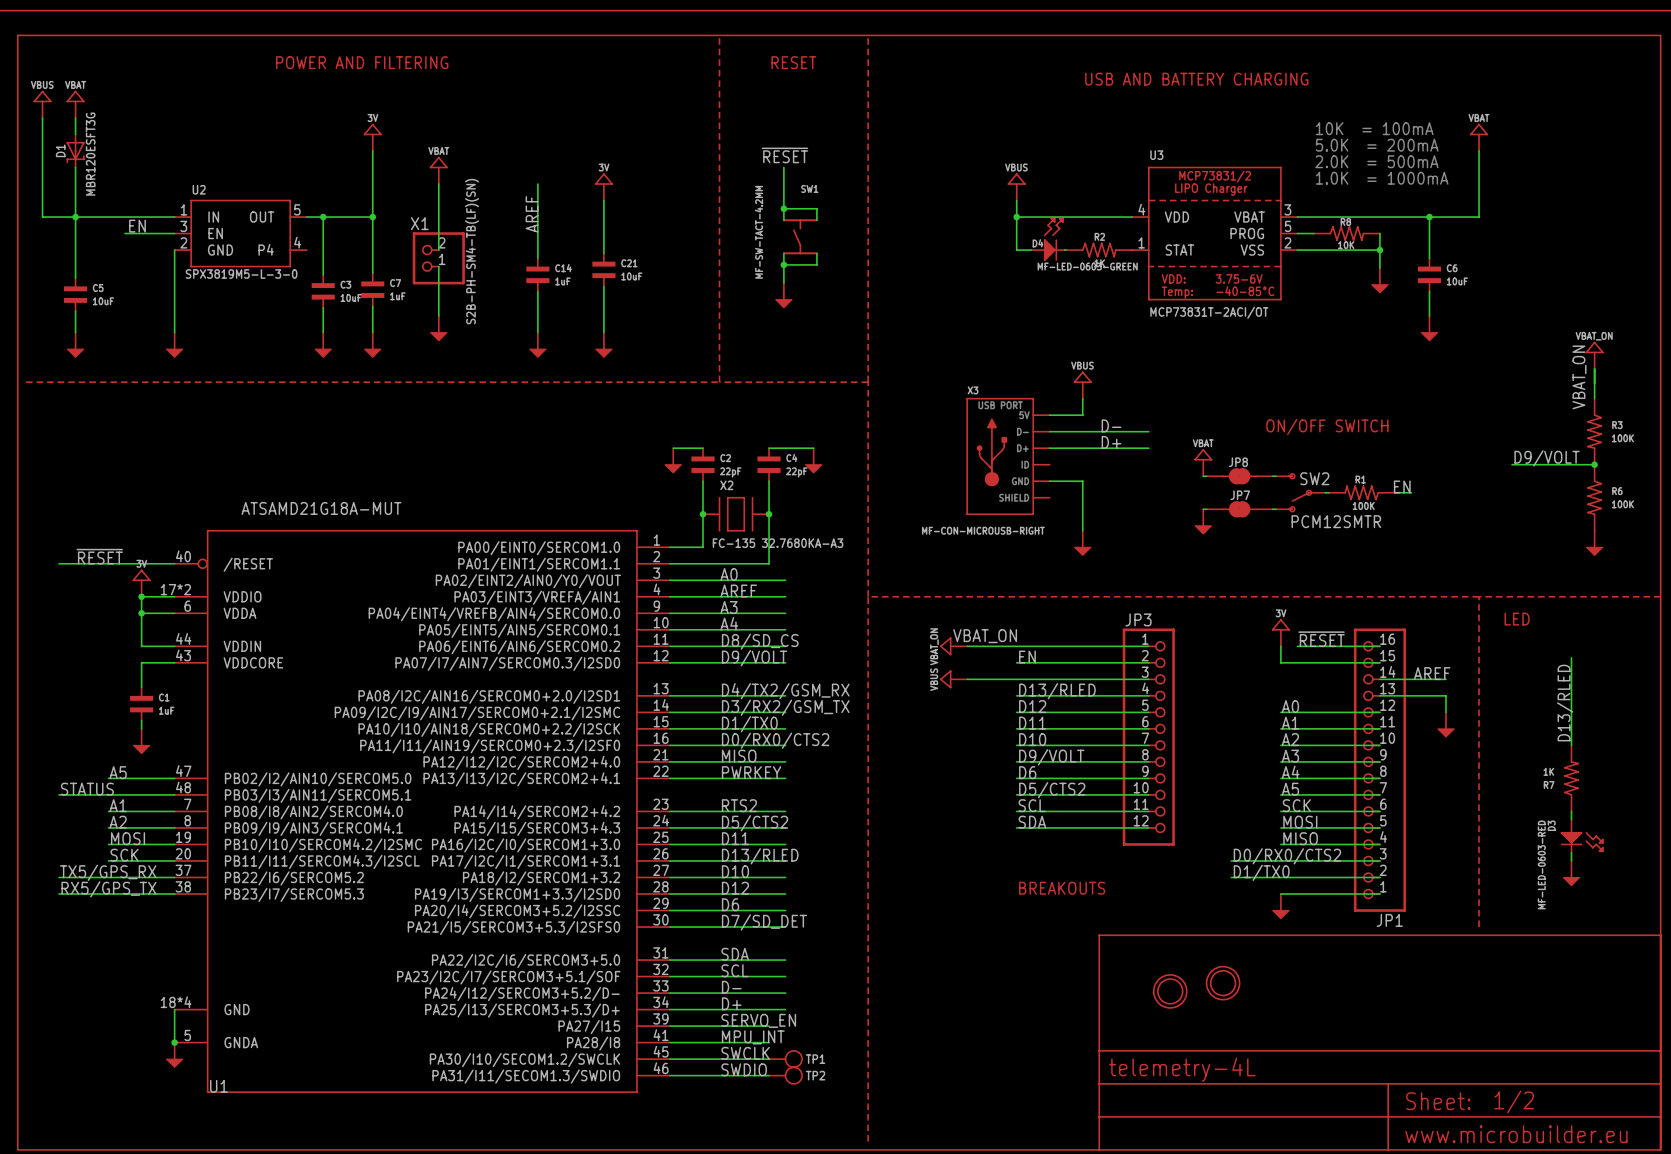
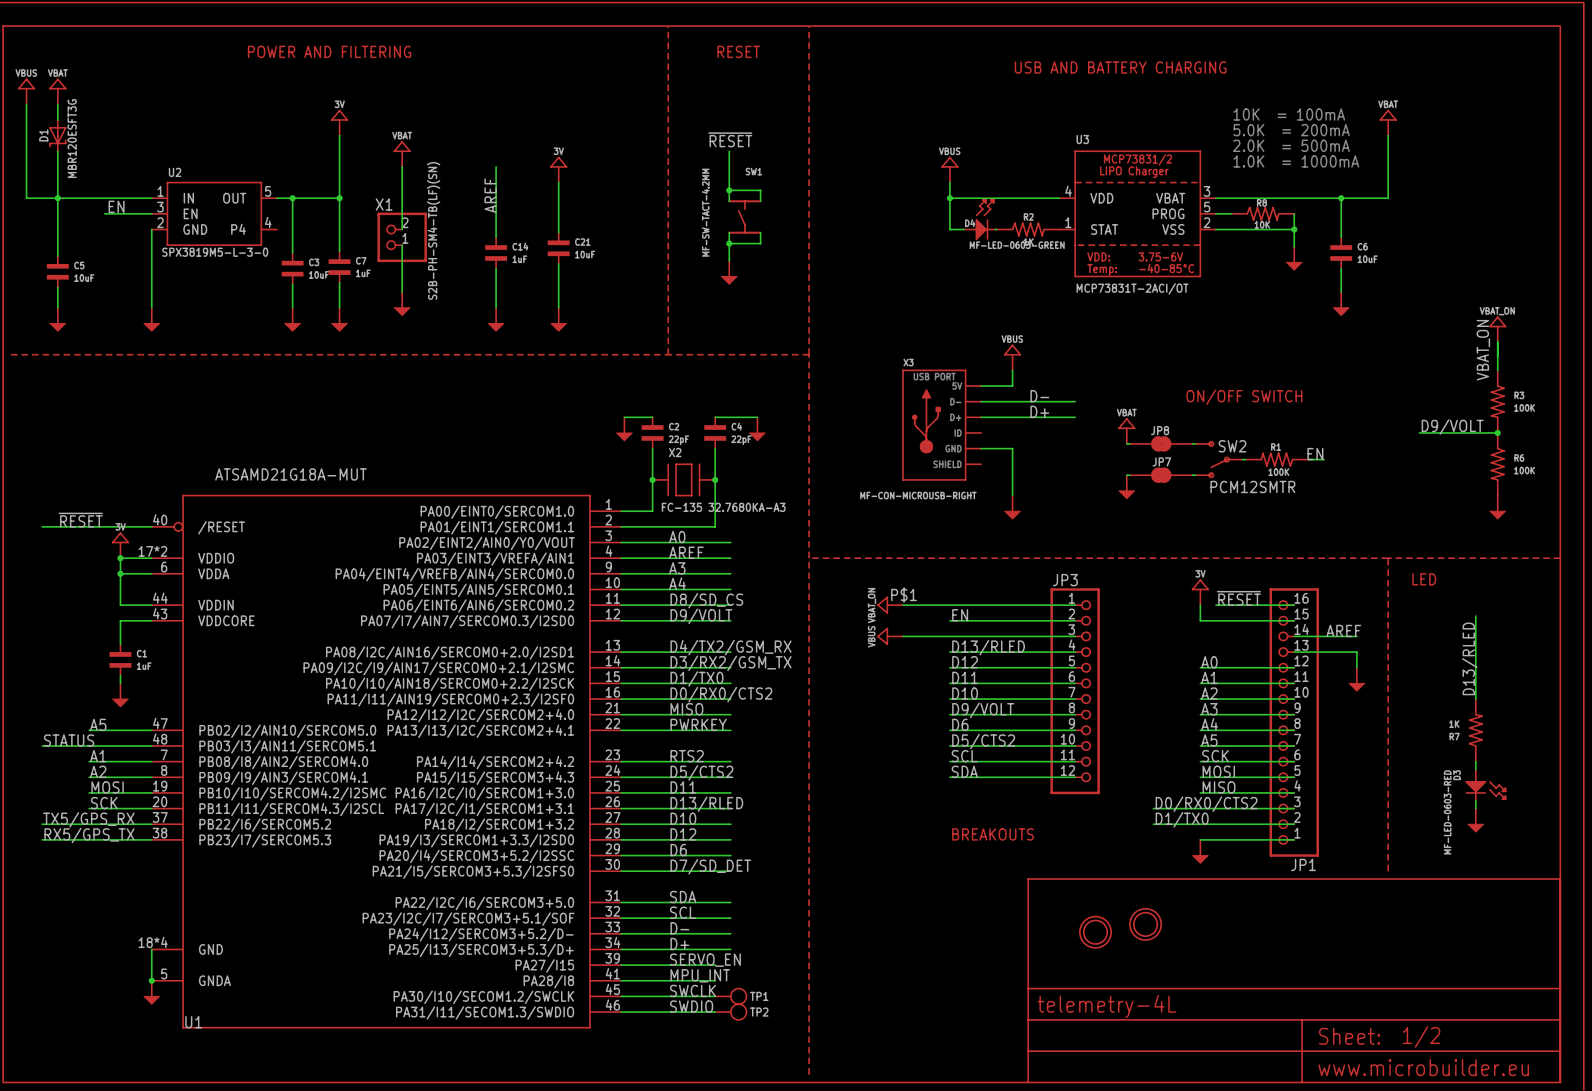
label: VBAT_ON (985, 636) -> P$1 (904, 594)

